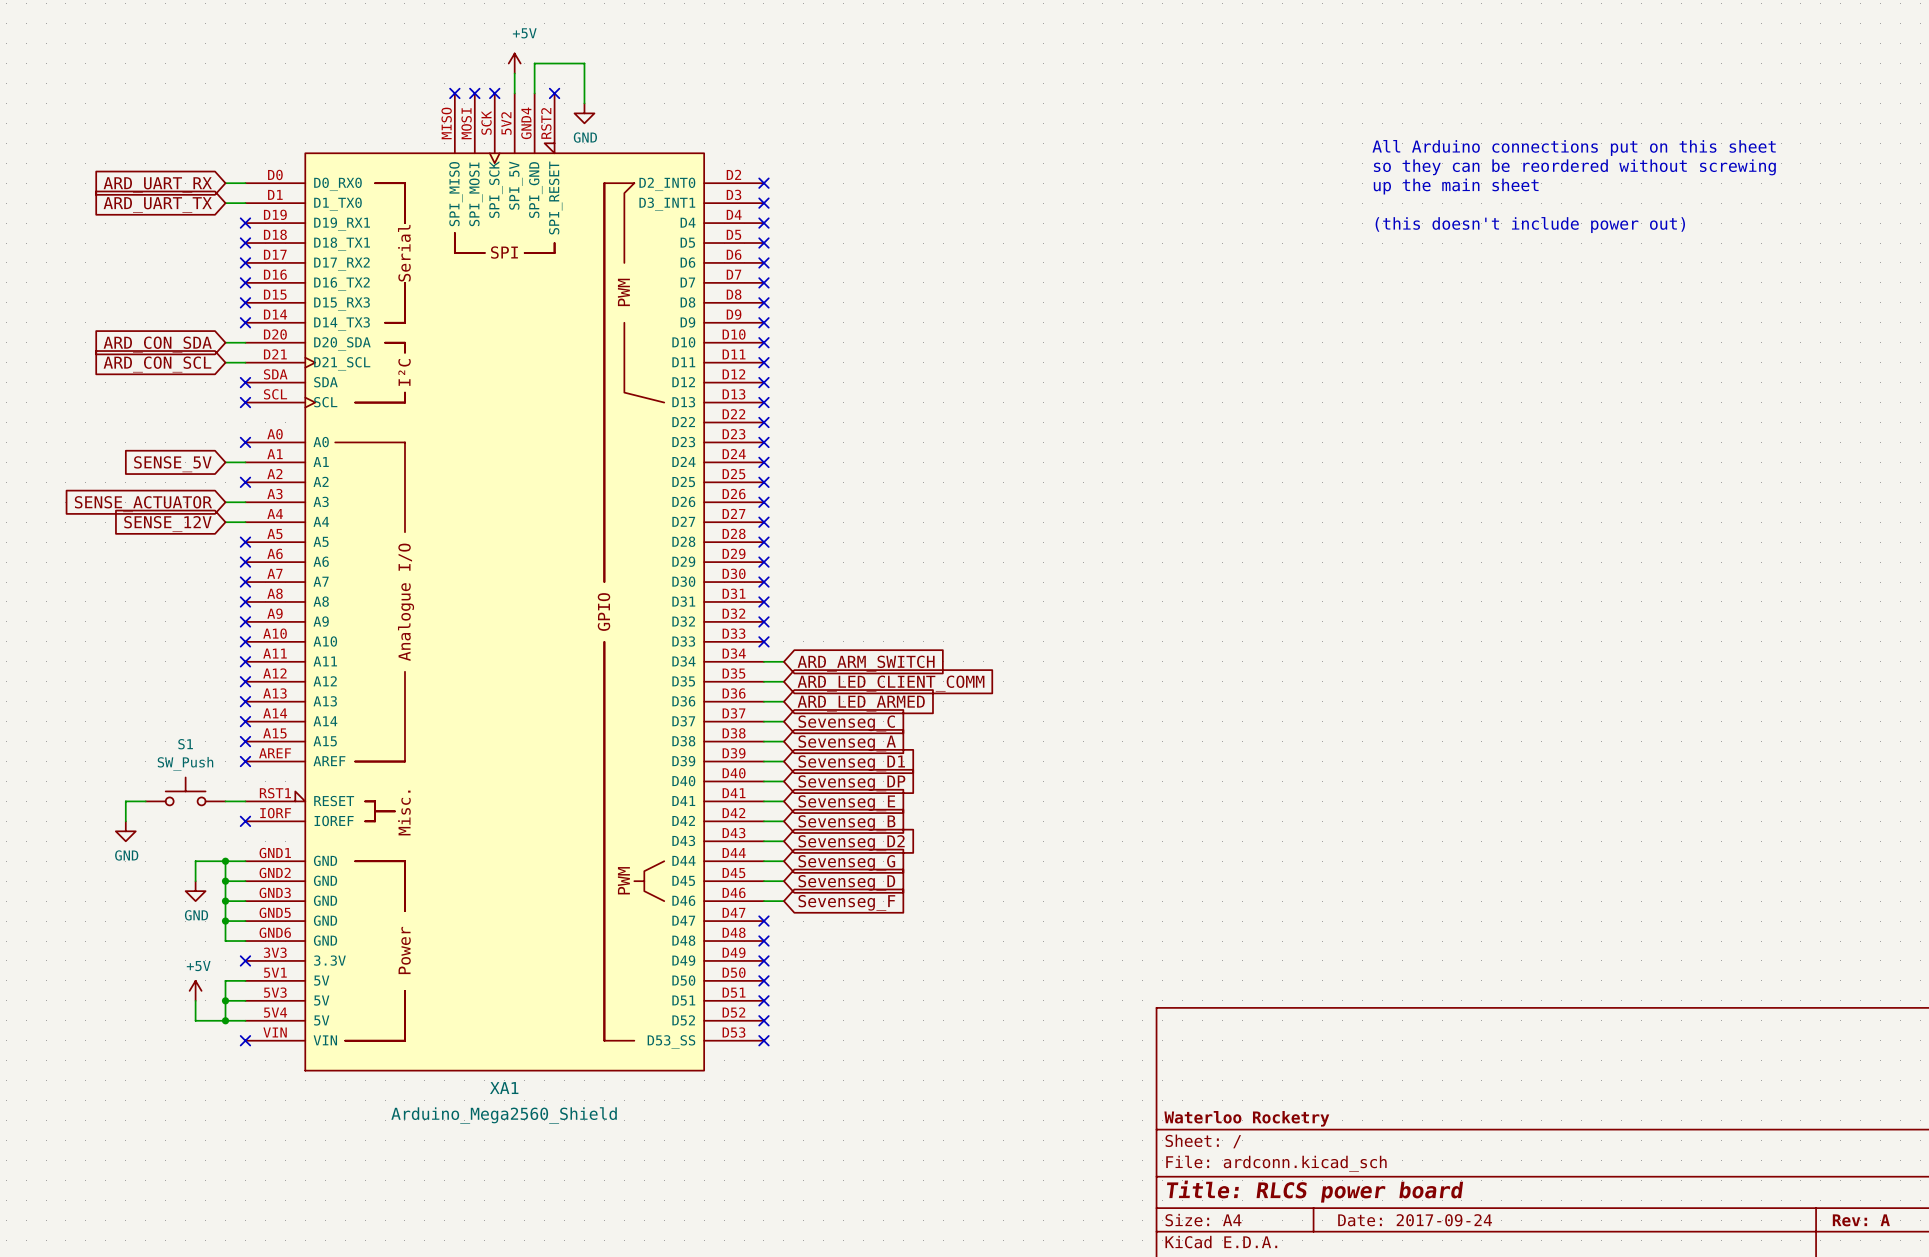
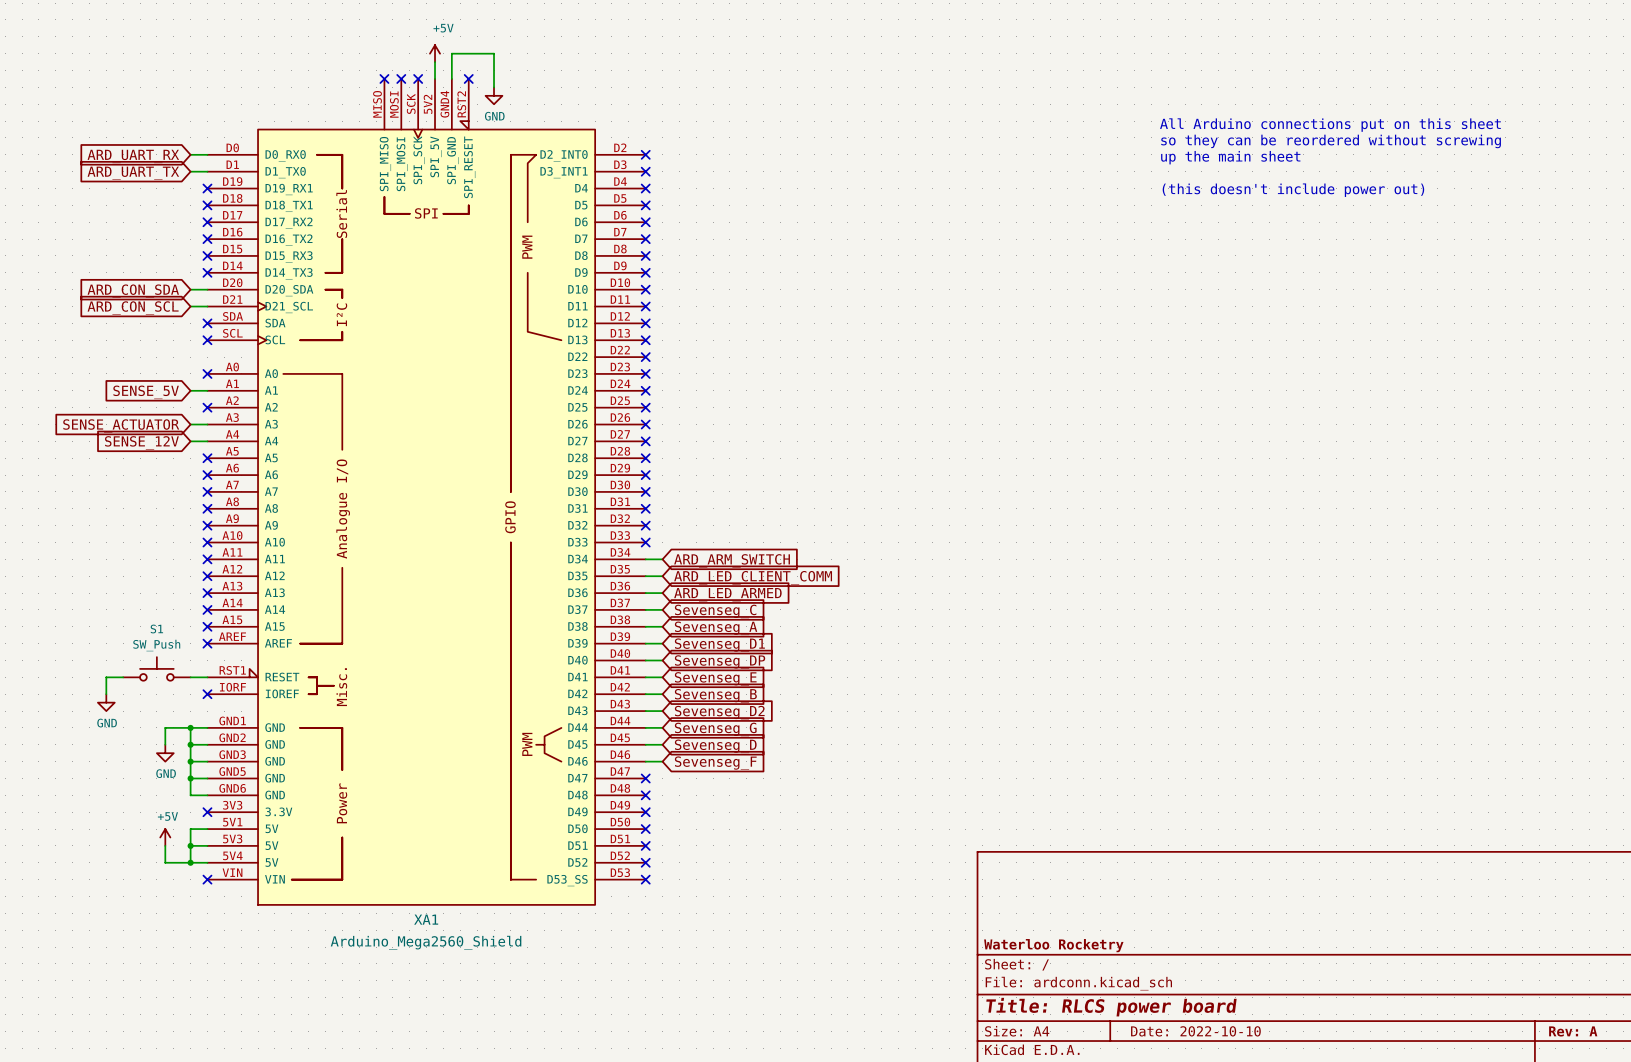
title block: Date: 2017-09-24 (1415, 1220) -> Date: 2022-10-10 (1195, 1031)

